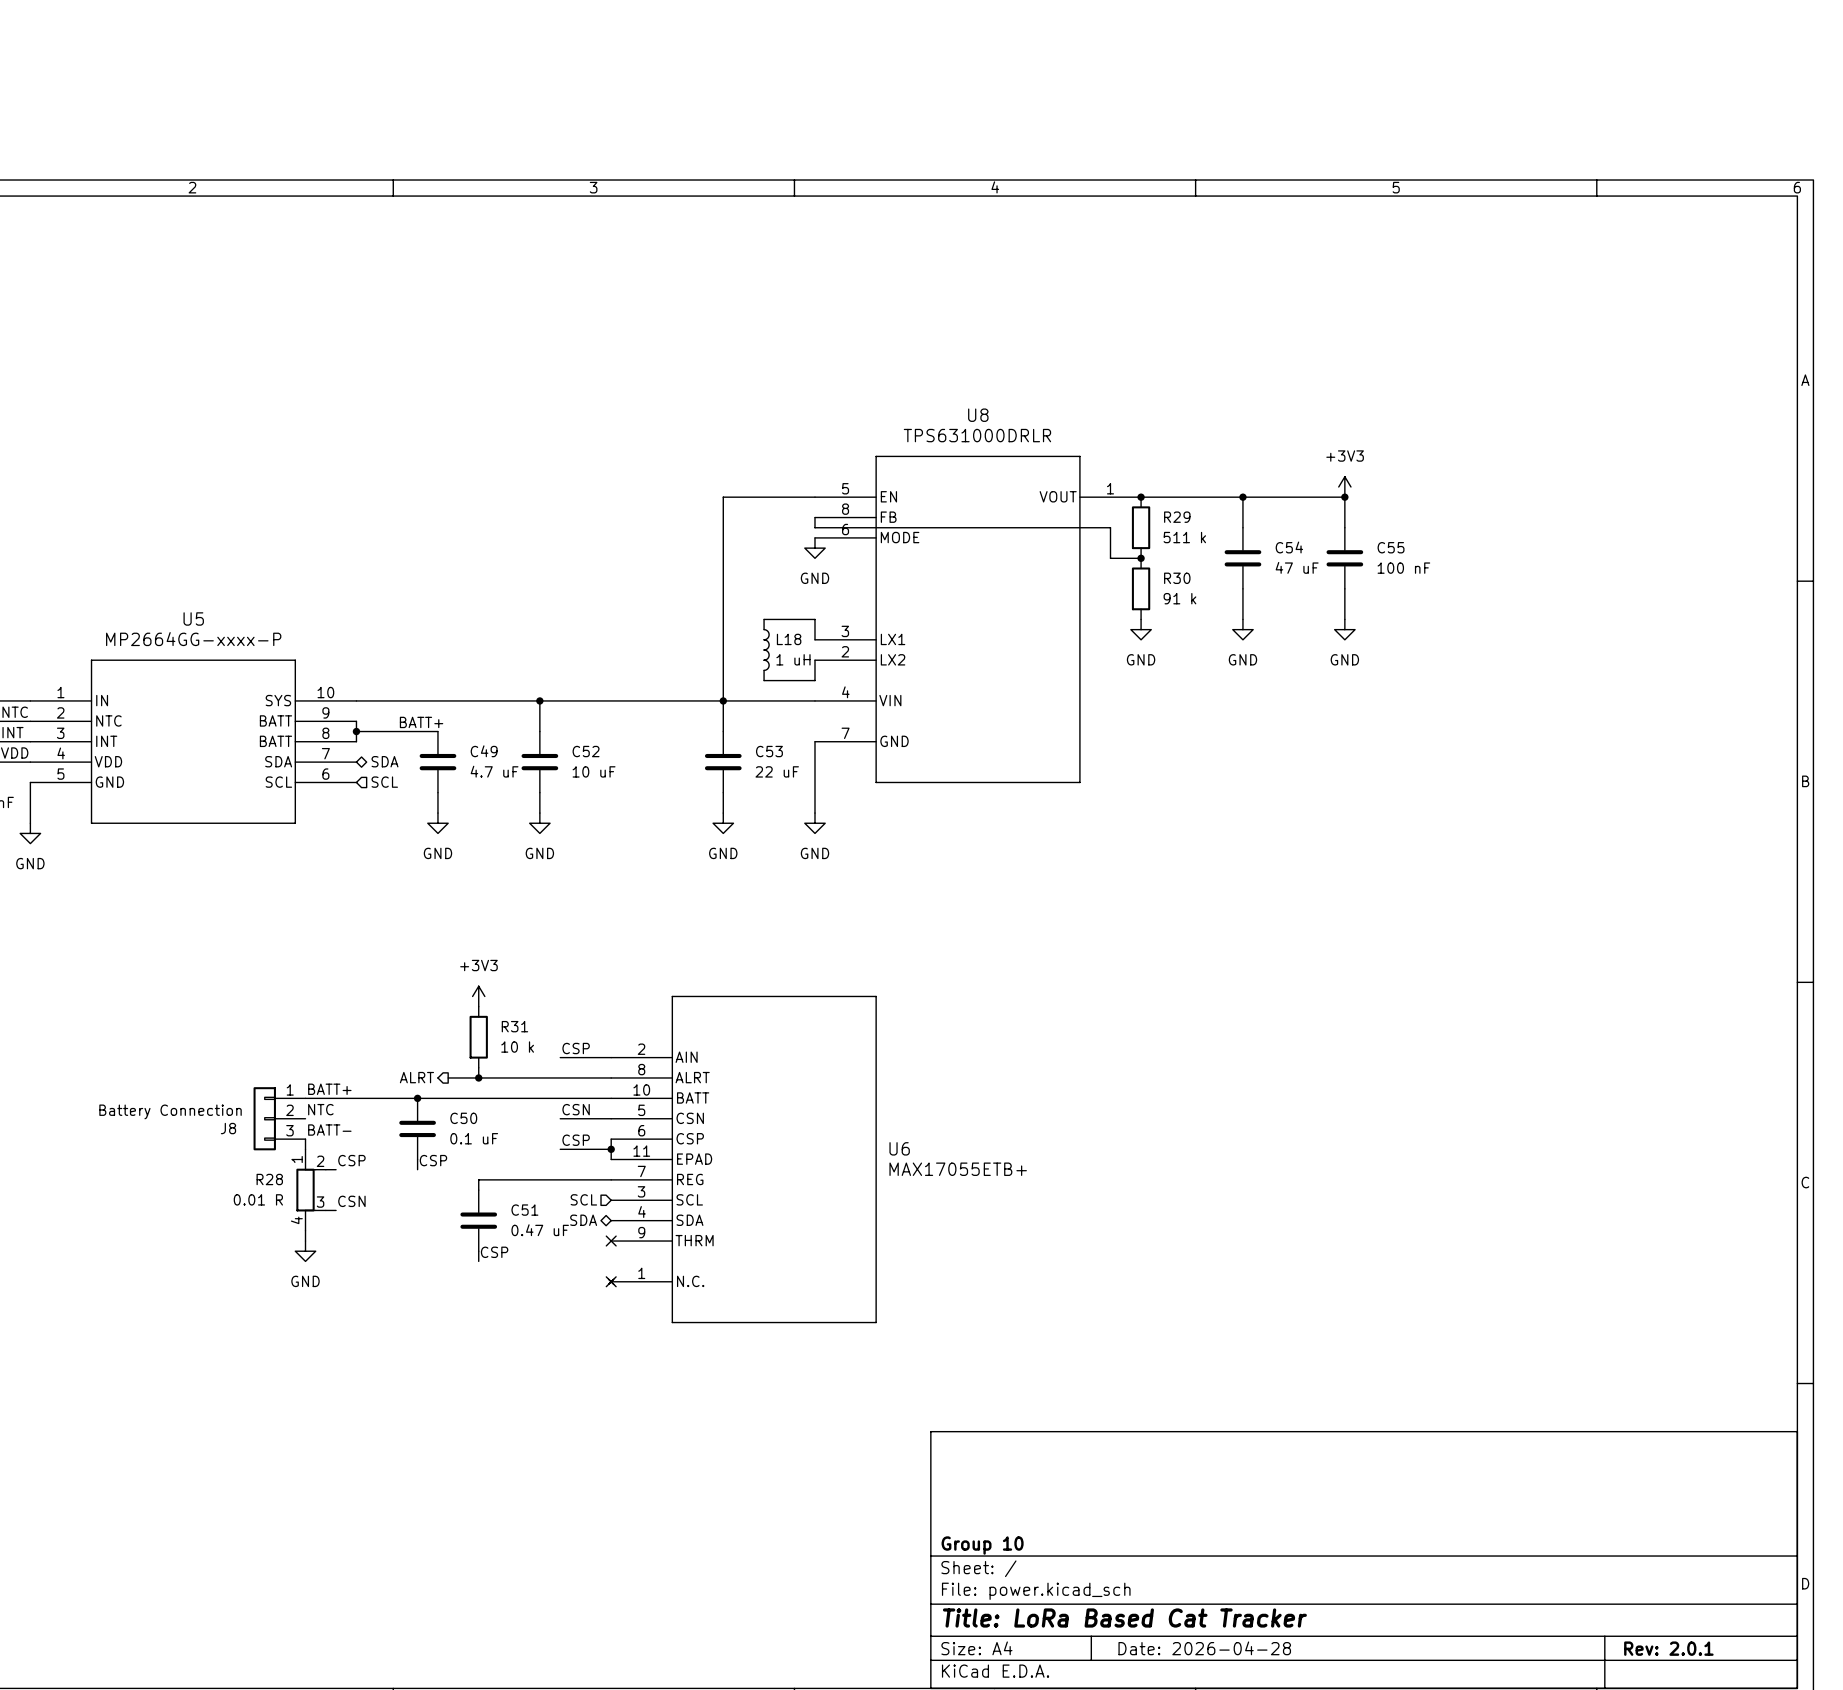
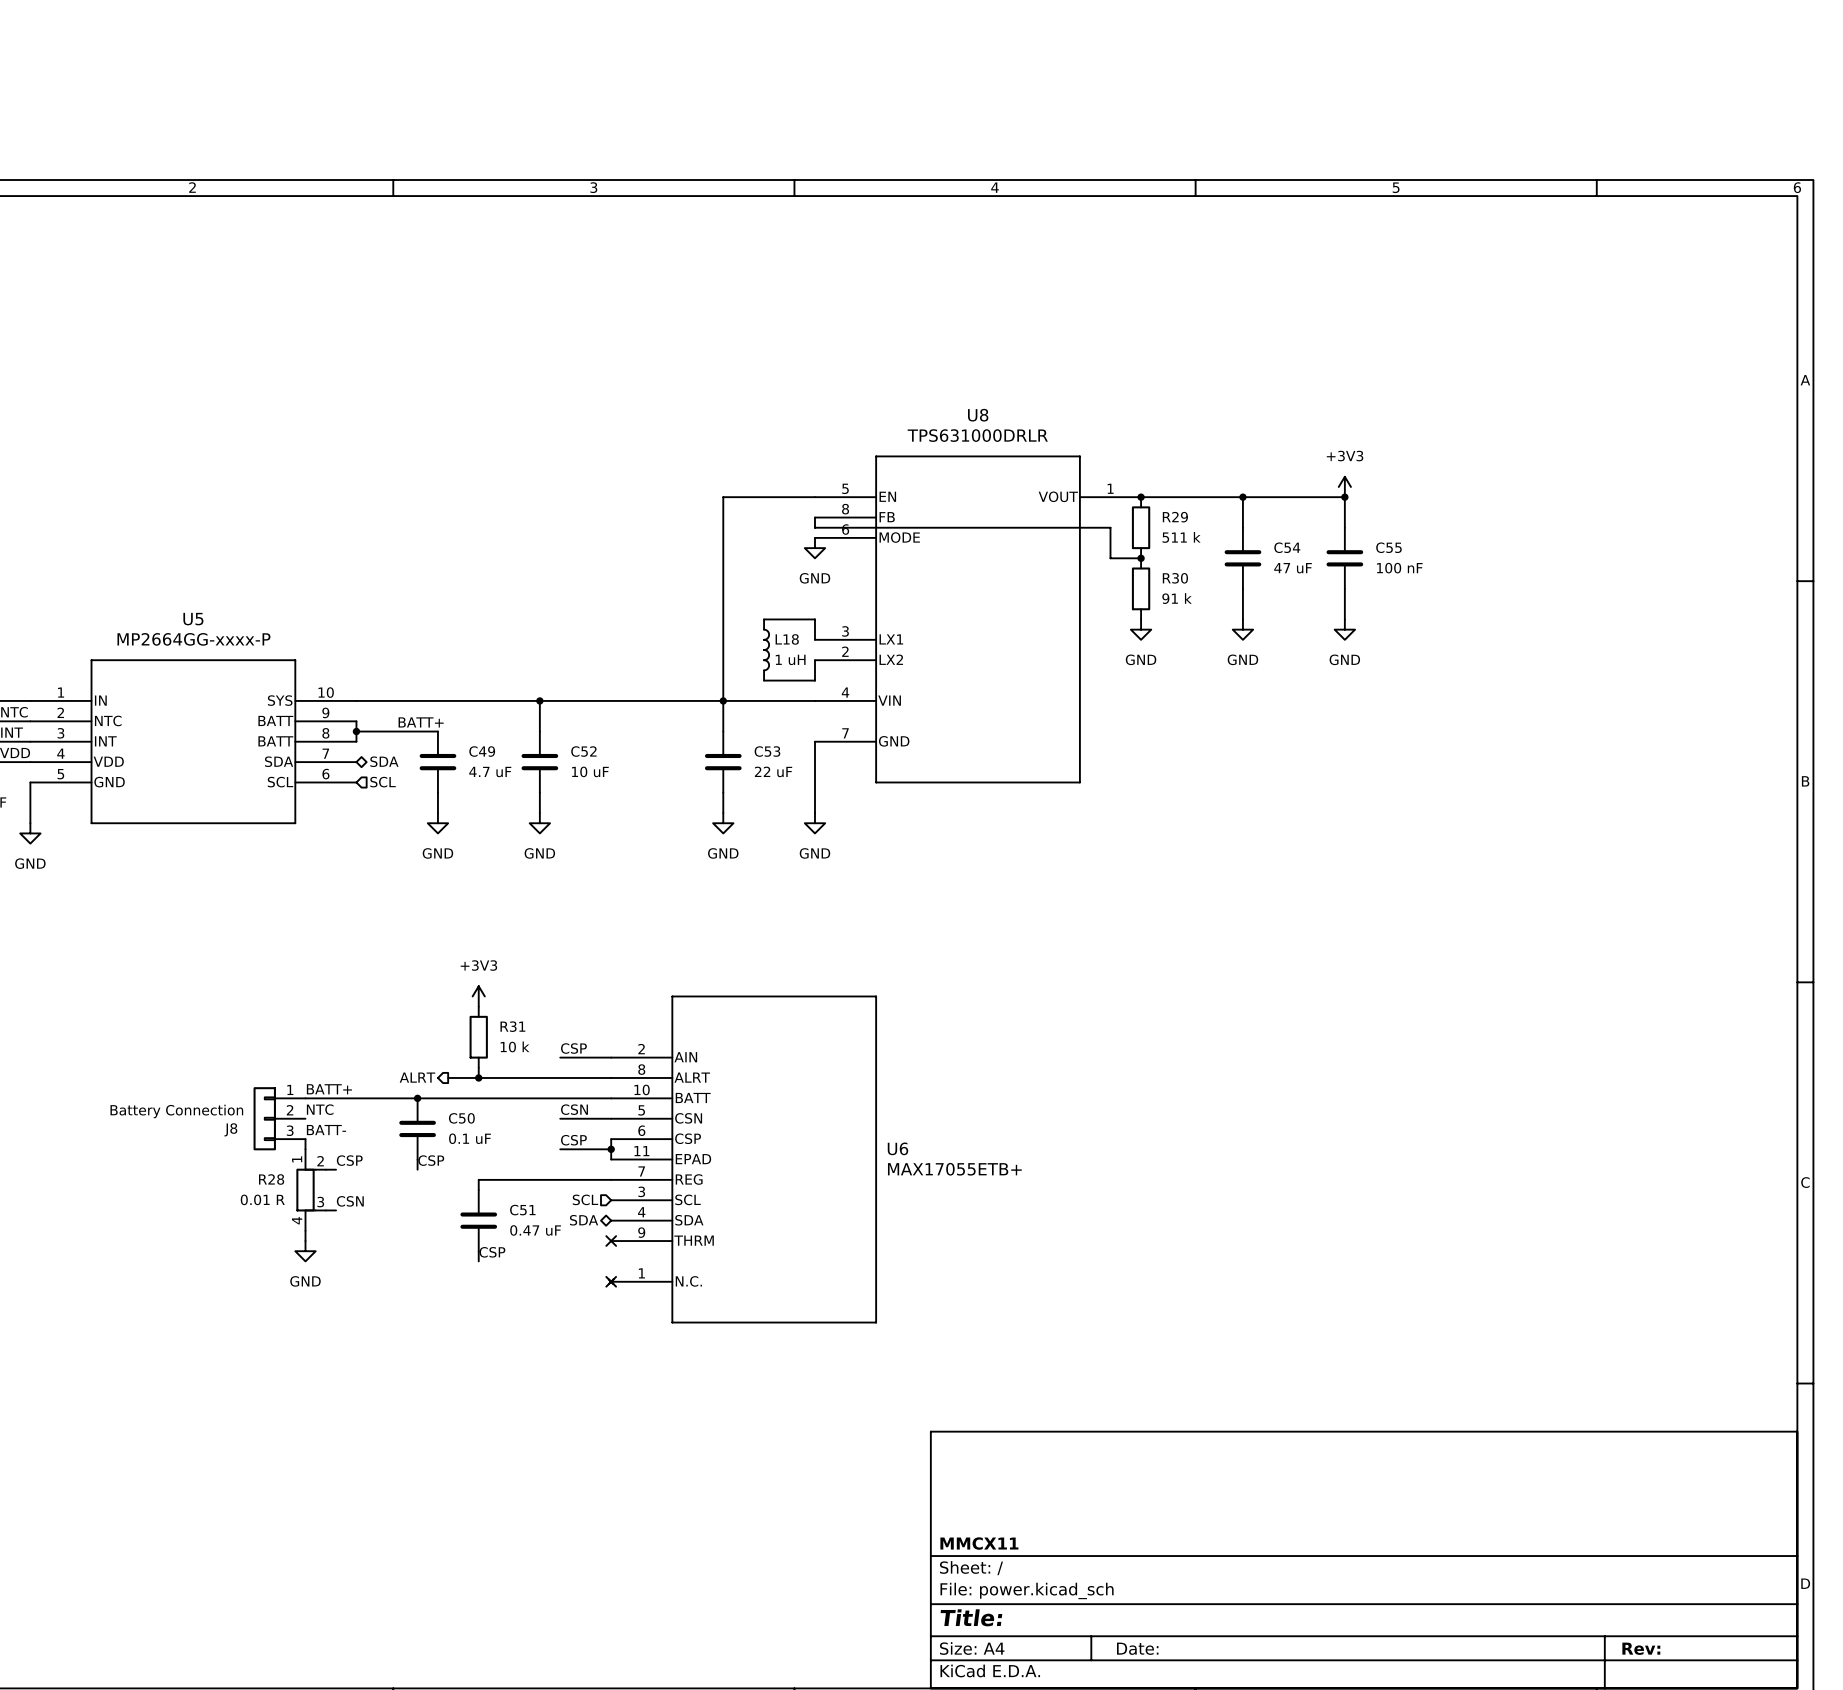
title block: Group 10 (982, 1545) -> MMCX11 (979, 1543)
title block: Title: LoRa Based Cat Tracker (1124, 1618) -> Title: (971, 1617)
title block: Date: 2026-04-28 (1204, 1648) -> Date: (1137, 1648)
title block: Rev: 2.0.1 (1668, 1648) -> Rev: (1641, 1648)

